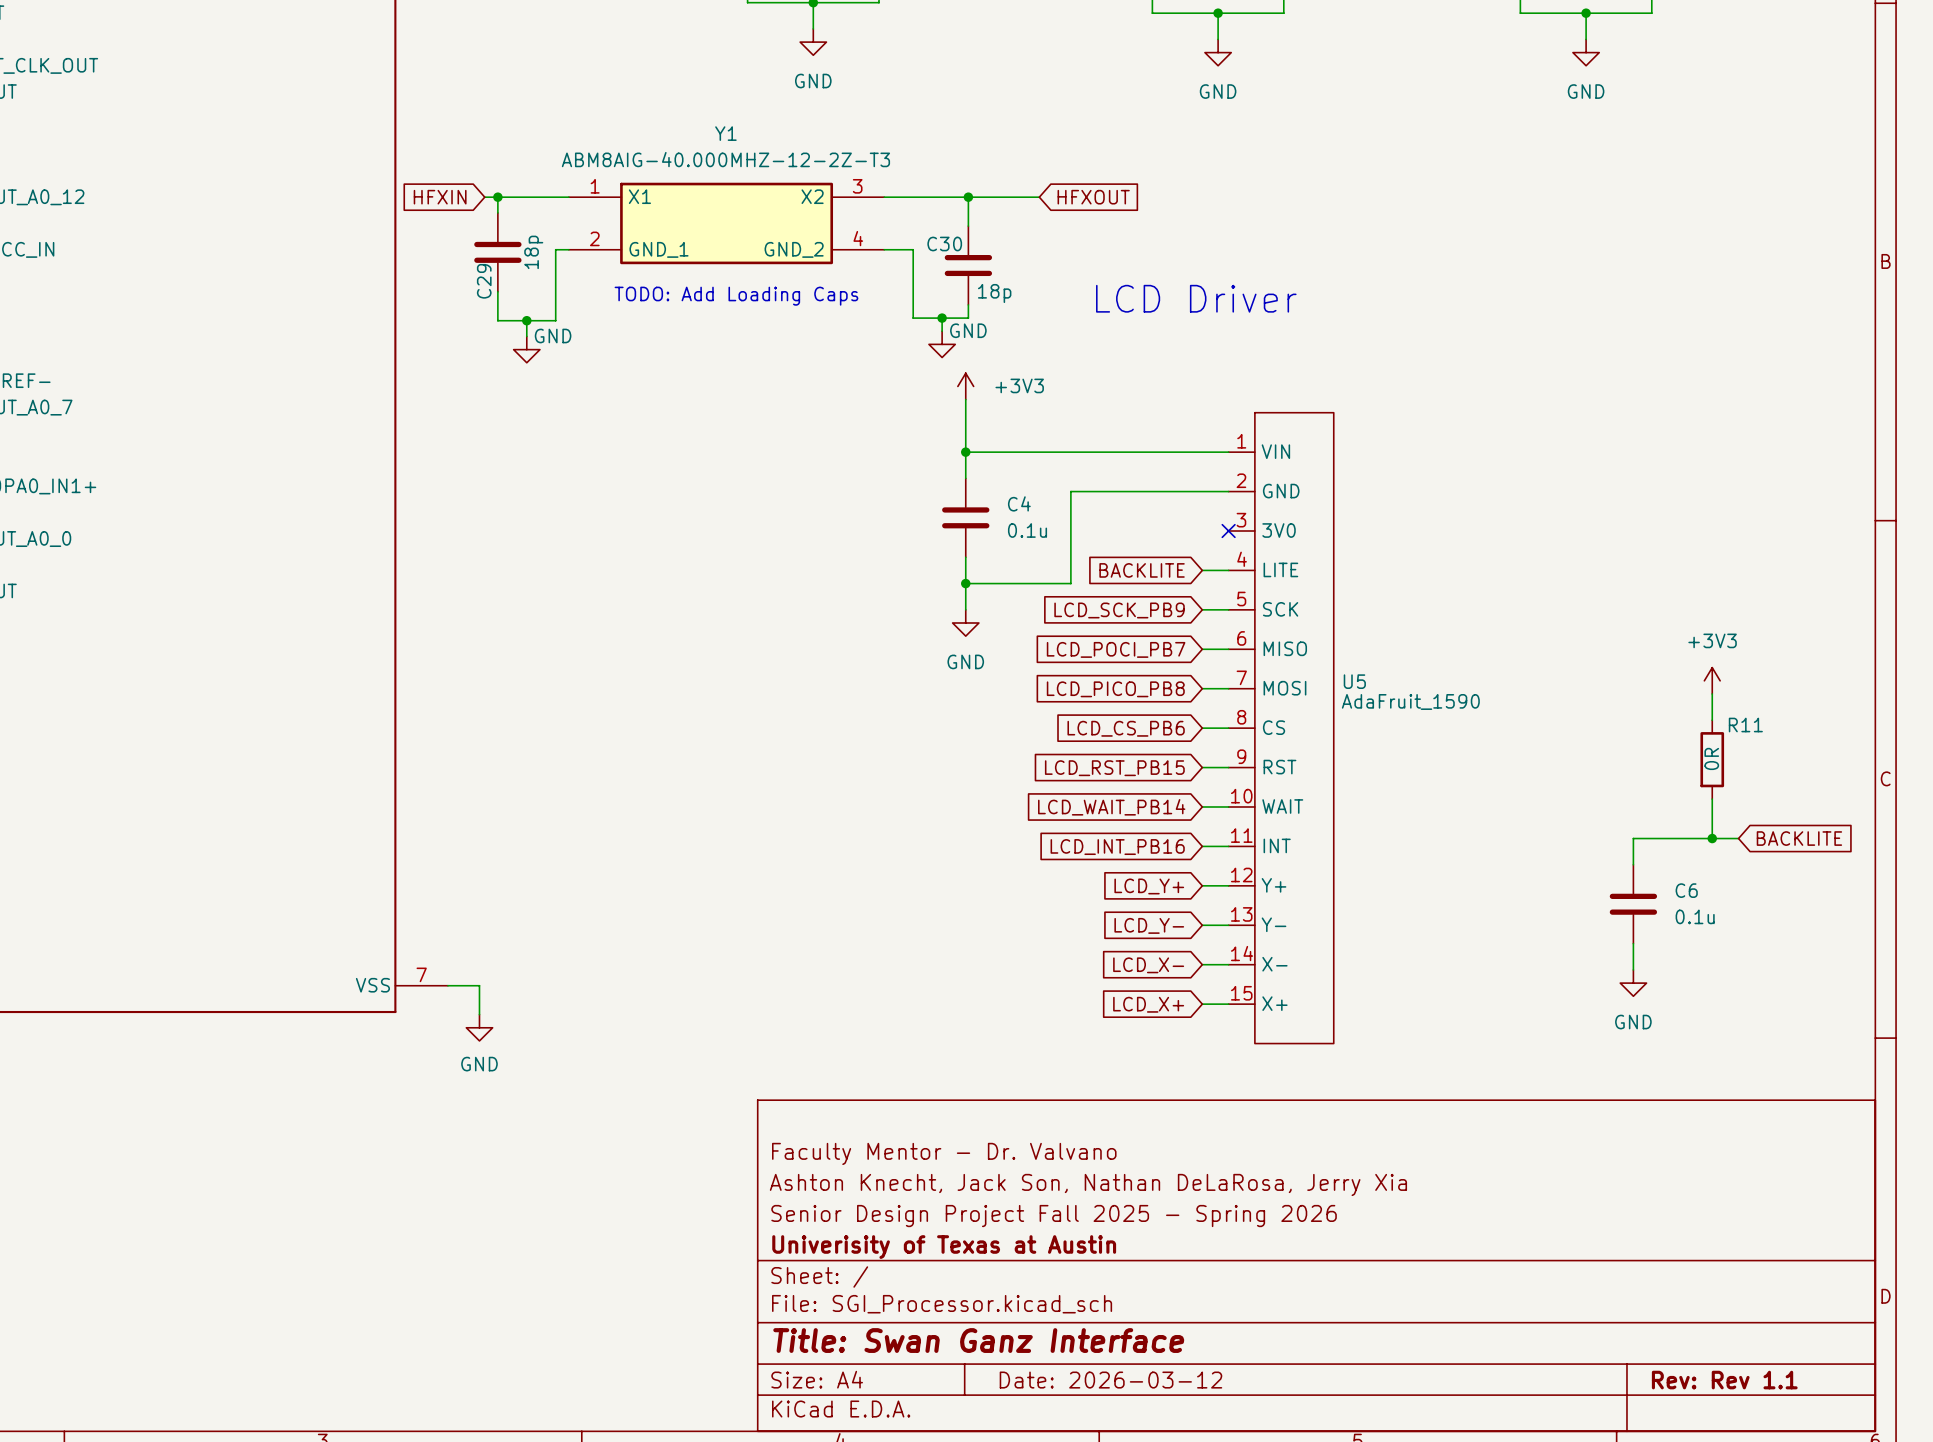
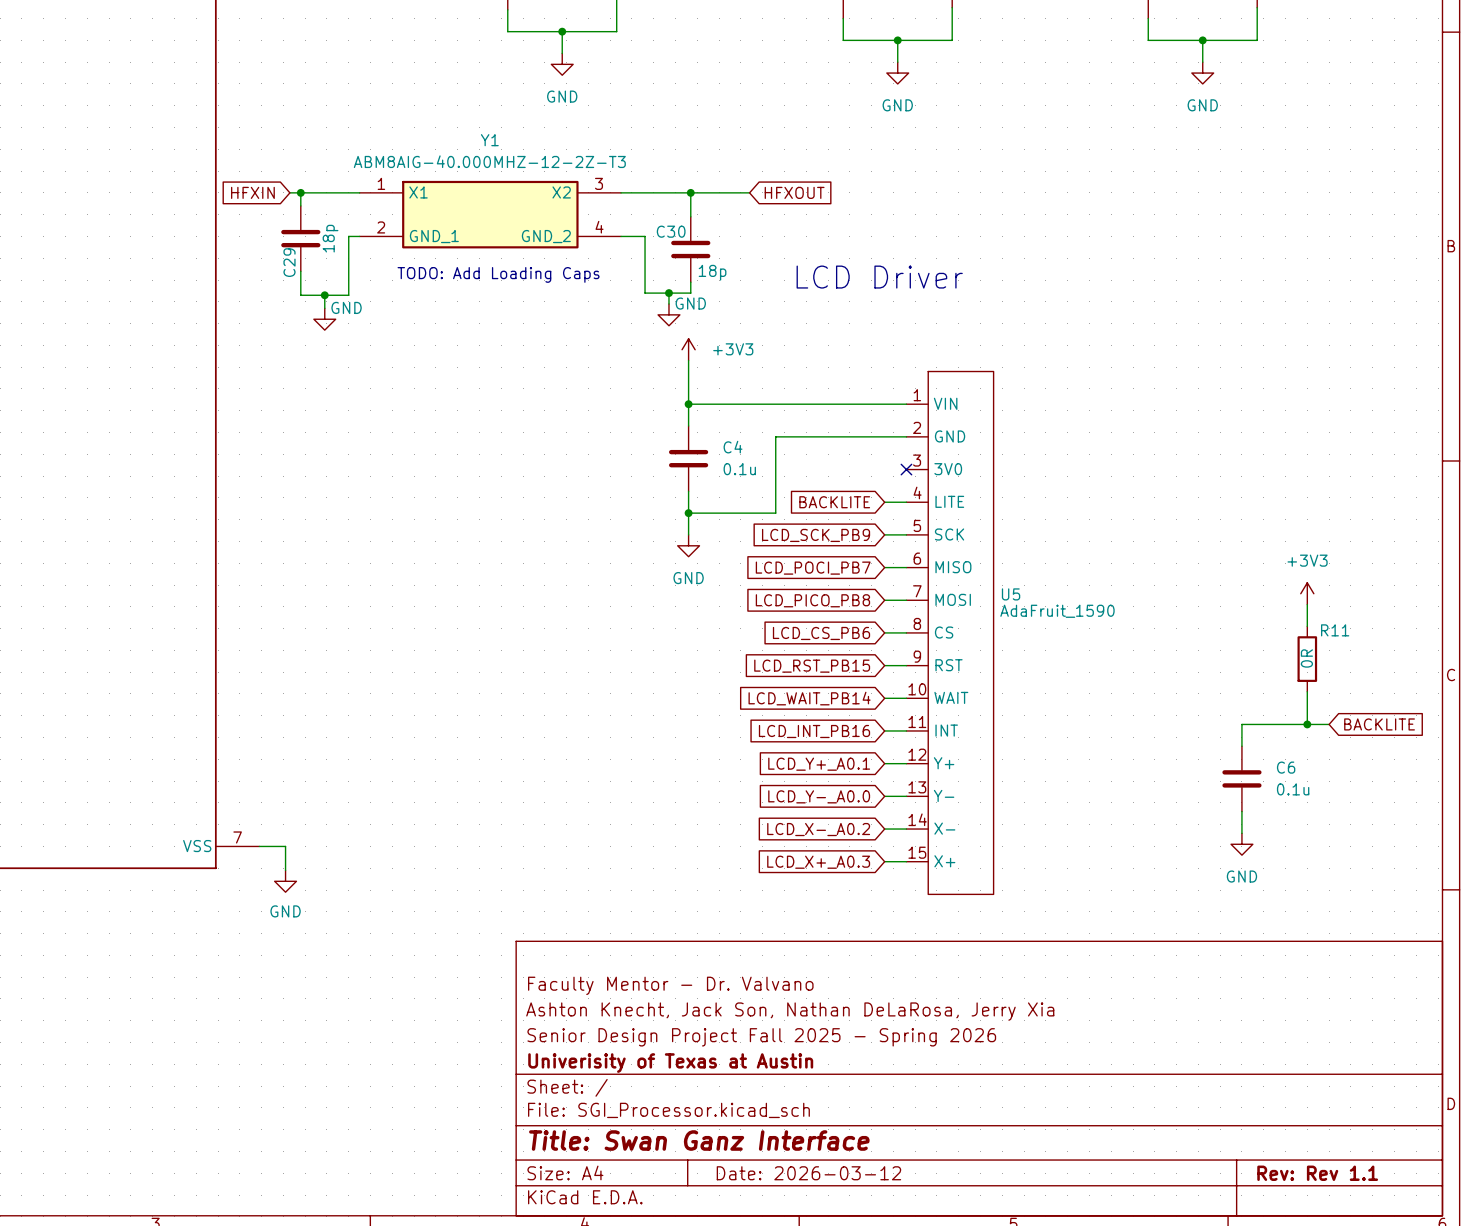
global label: LCD_Y+ (1149, 886) -> LCD_Y+_A0.1 (819, 764)
global label: LCD_Y- (1149, 925) -> LCD_Y-_A0.0 (819, 796)
global label: LCD_X- (1148, 965) -> LCD_X-_A0.2 (818, 829)
global label: LCD_X+ (1148, 1004) -> LCD_X+_A0.3 (818, 862)

